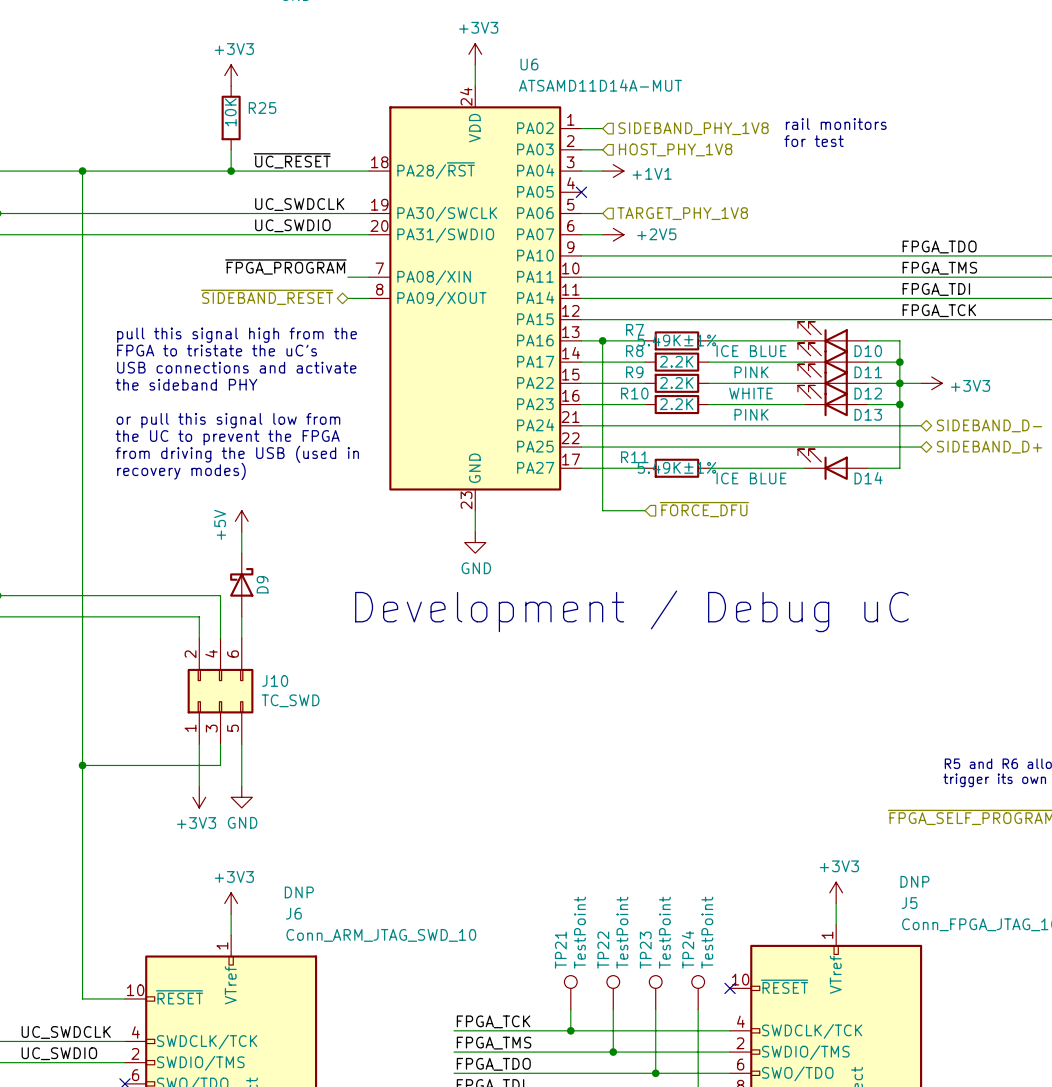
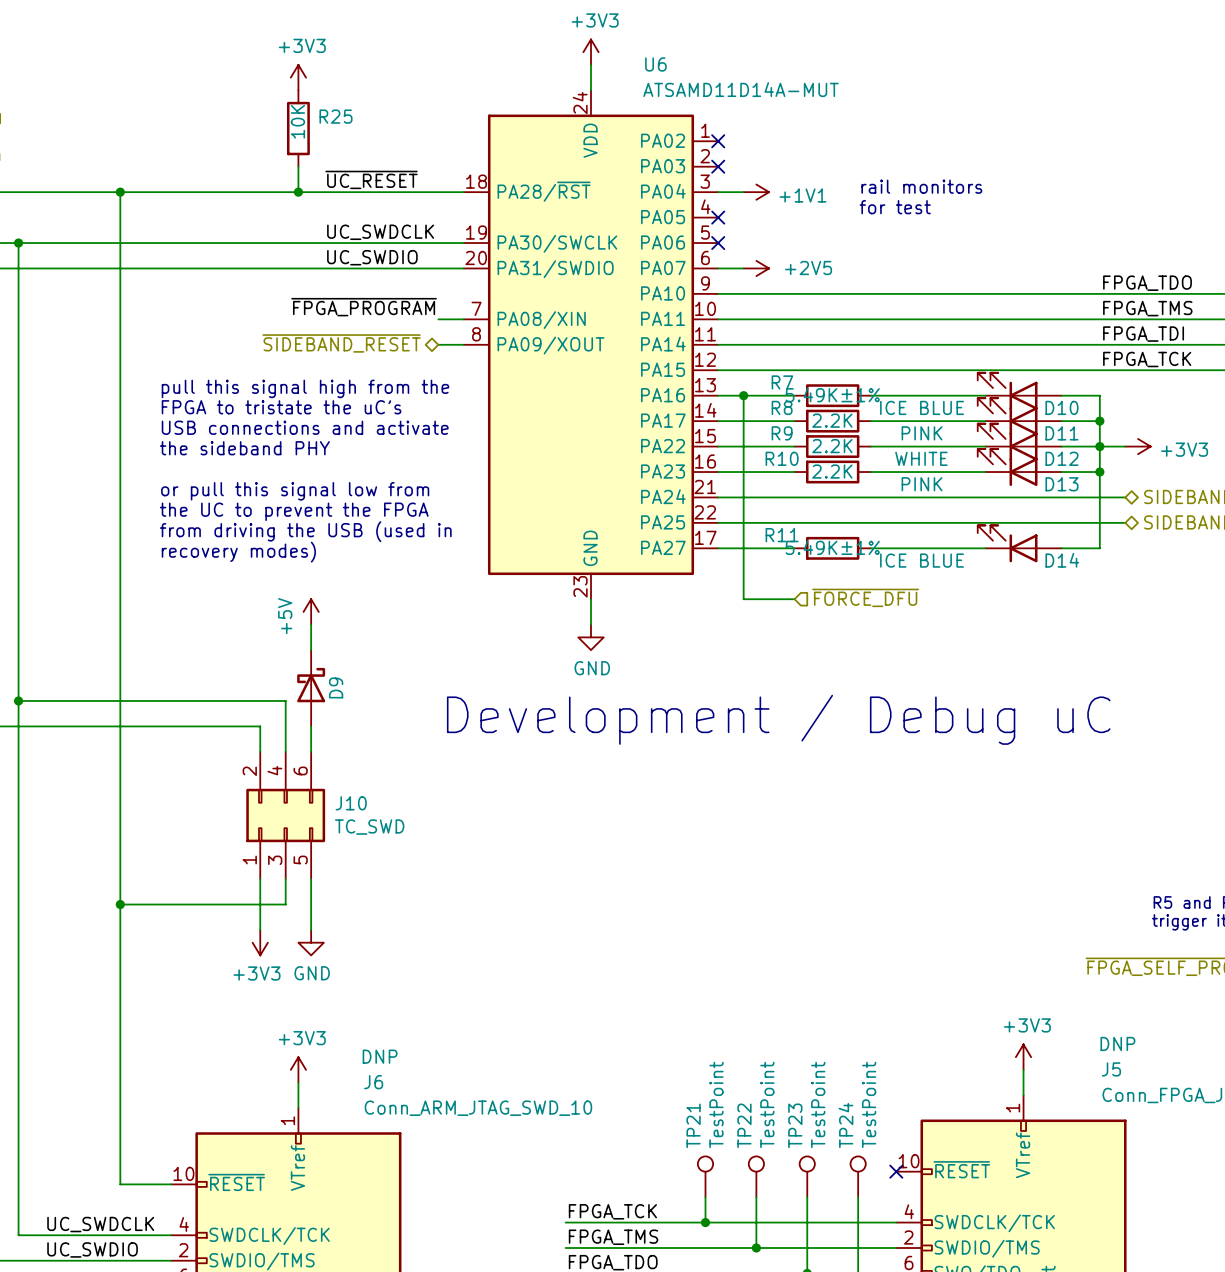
text position: rail monitors (836, 124) -> rail monitors (921, 186)
wire: (581, 128) (602, 128) -> none
no-connect mark: none -> (718, 141)
hierarchical label: SIDEBAND_PHY_1V8 (693, 128) -> none
text position: for test (814, 141) -> for test (895, 207)
wire: (581, 149) (602, 149) -> none
no-connect mark: none -> (718, 166)
hierarchical label: HOST_PHY_1V8 (675, 149) -> none
wire: (581, 213) (602, 213) -> none
no-connect mark: none -> (718, 243)
hierarchical label: TARGET_PHY_1V8 (682, 213) -> none

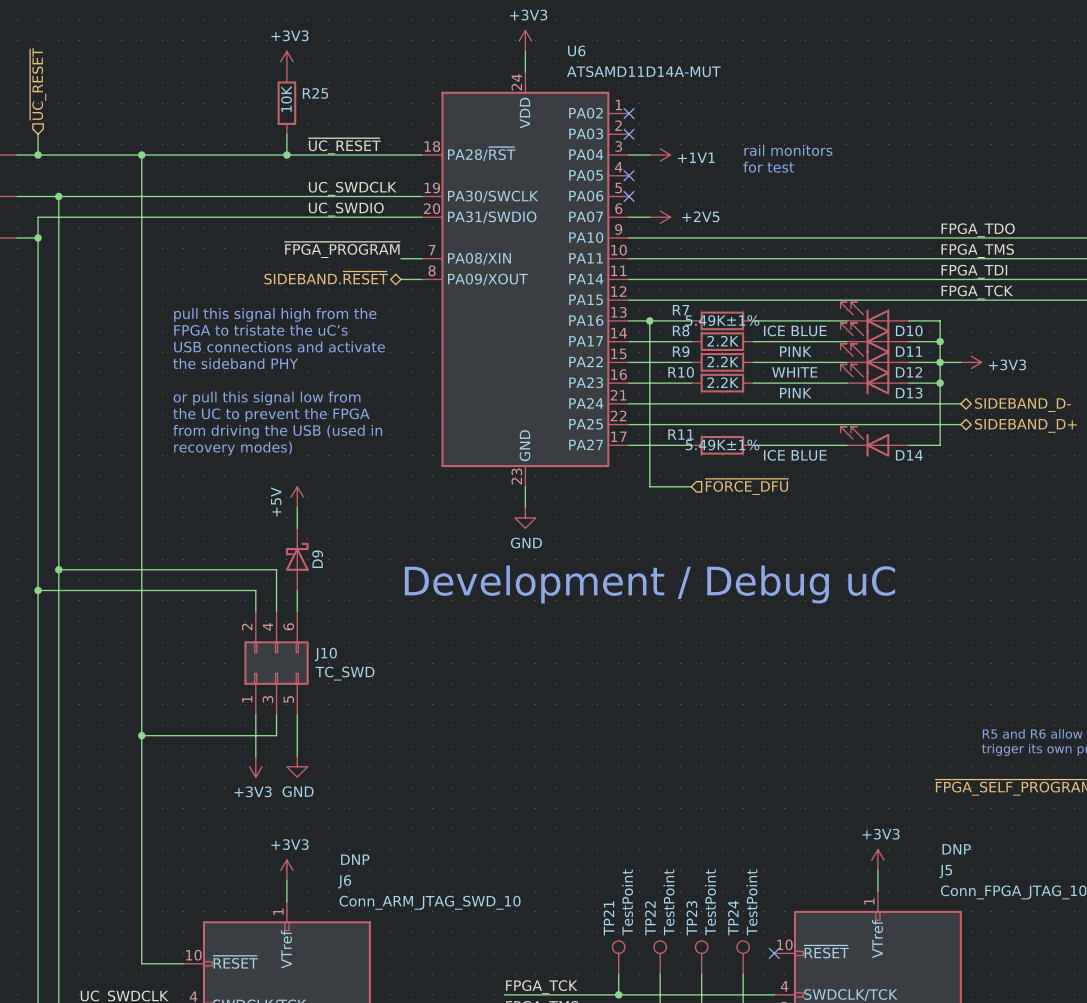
hierarchical label: ~{SIDEBAND_RESET} (341, 343) -> SIDEBAND.~{RESET} (326, 277)

